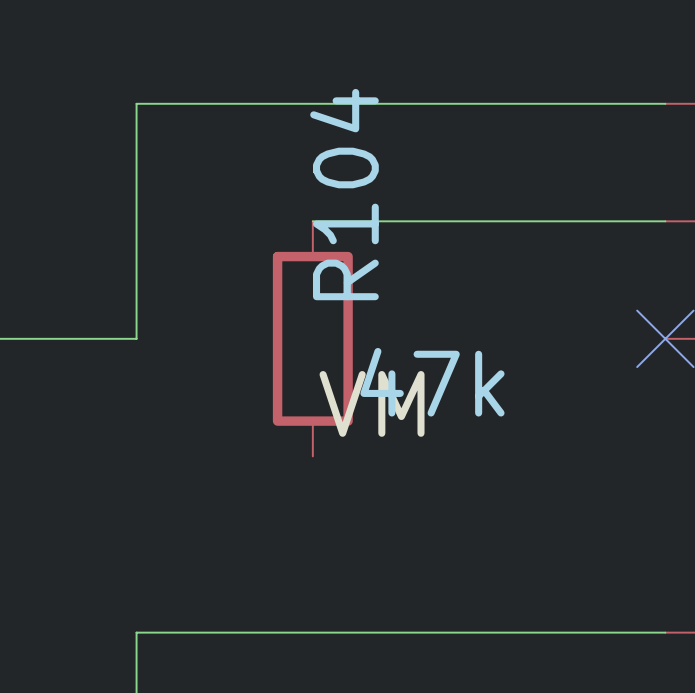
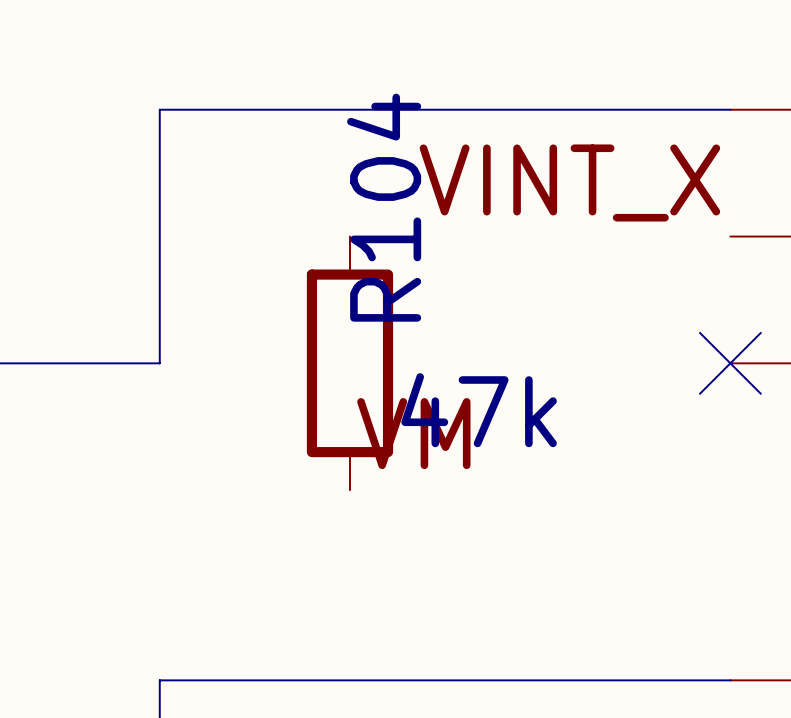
label: none -> VINT_X (569, 182)
wire: (312, 221) (665, 221) -> none

